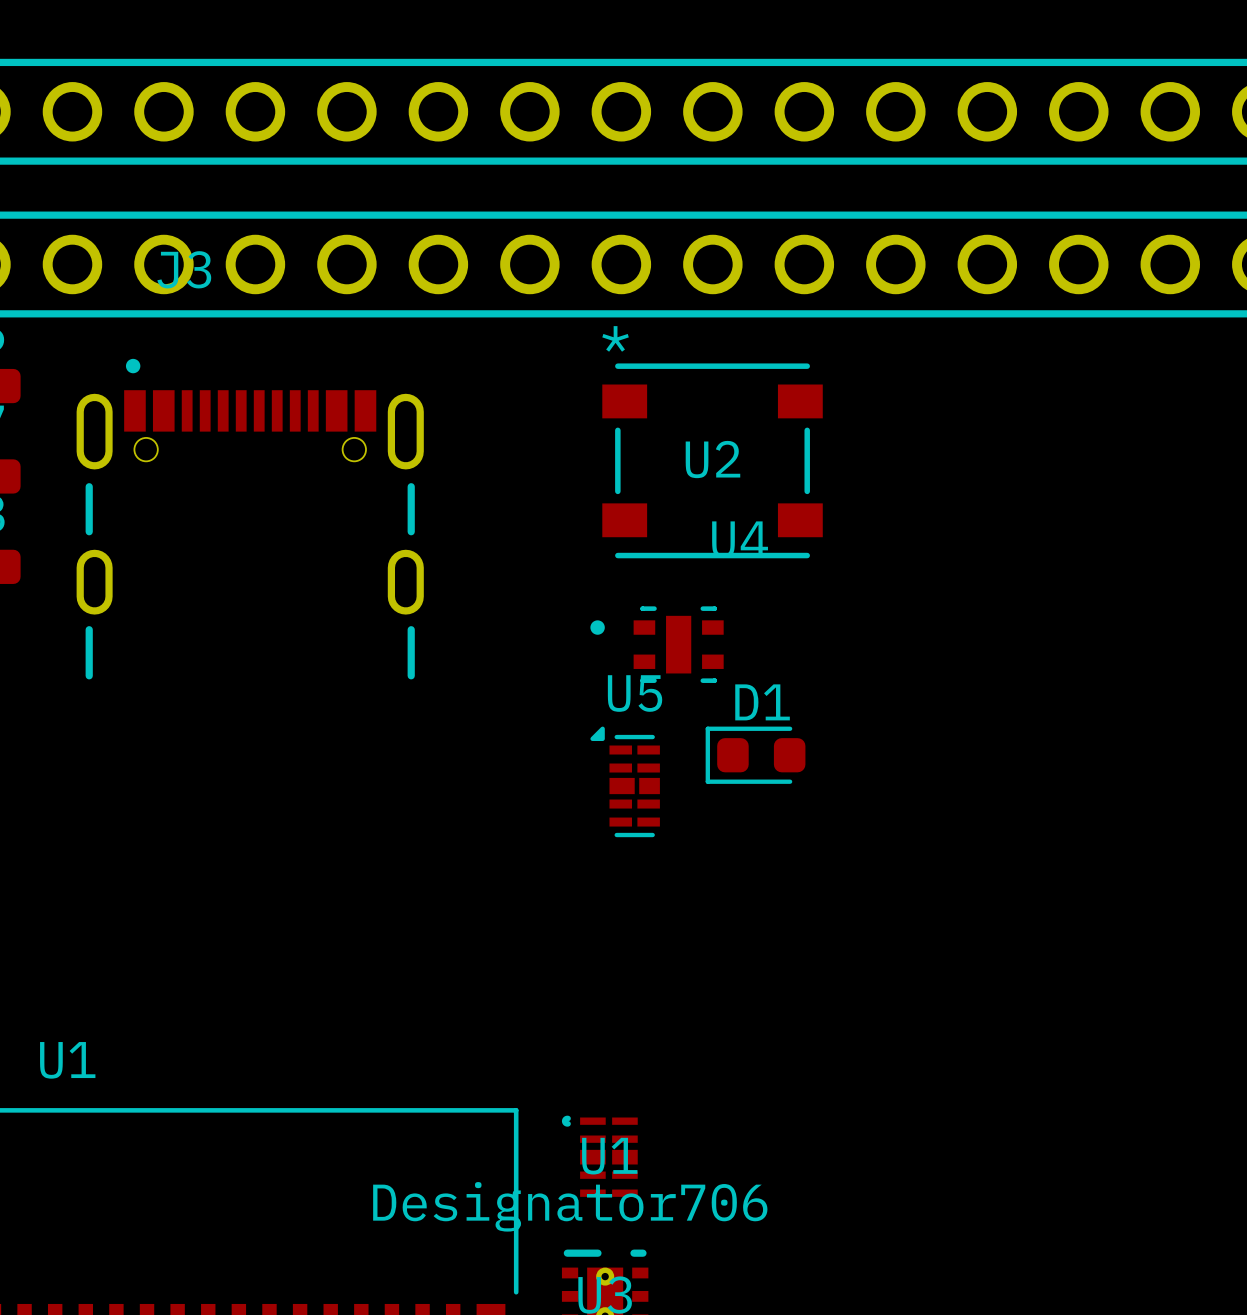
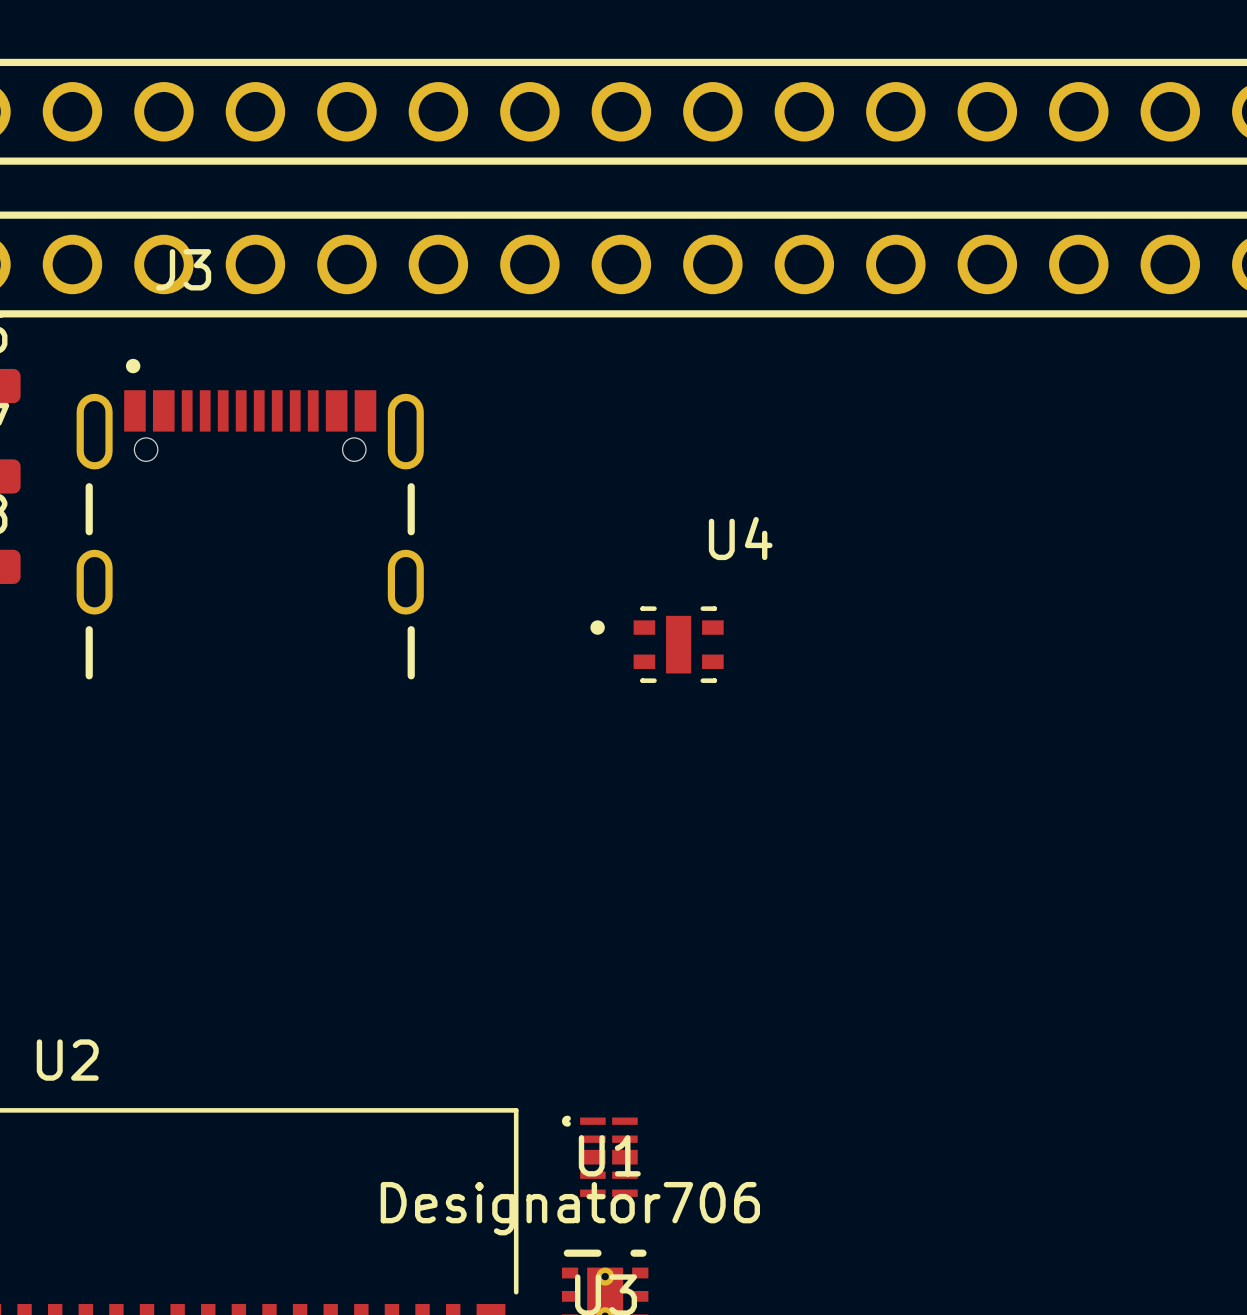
U2: (712, 460) -> none
D1: (755, 755) -> none
U5: (625, 781) -> none
U1 name: U1 (67, 1060) -> U2 (67, 1060)

